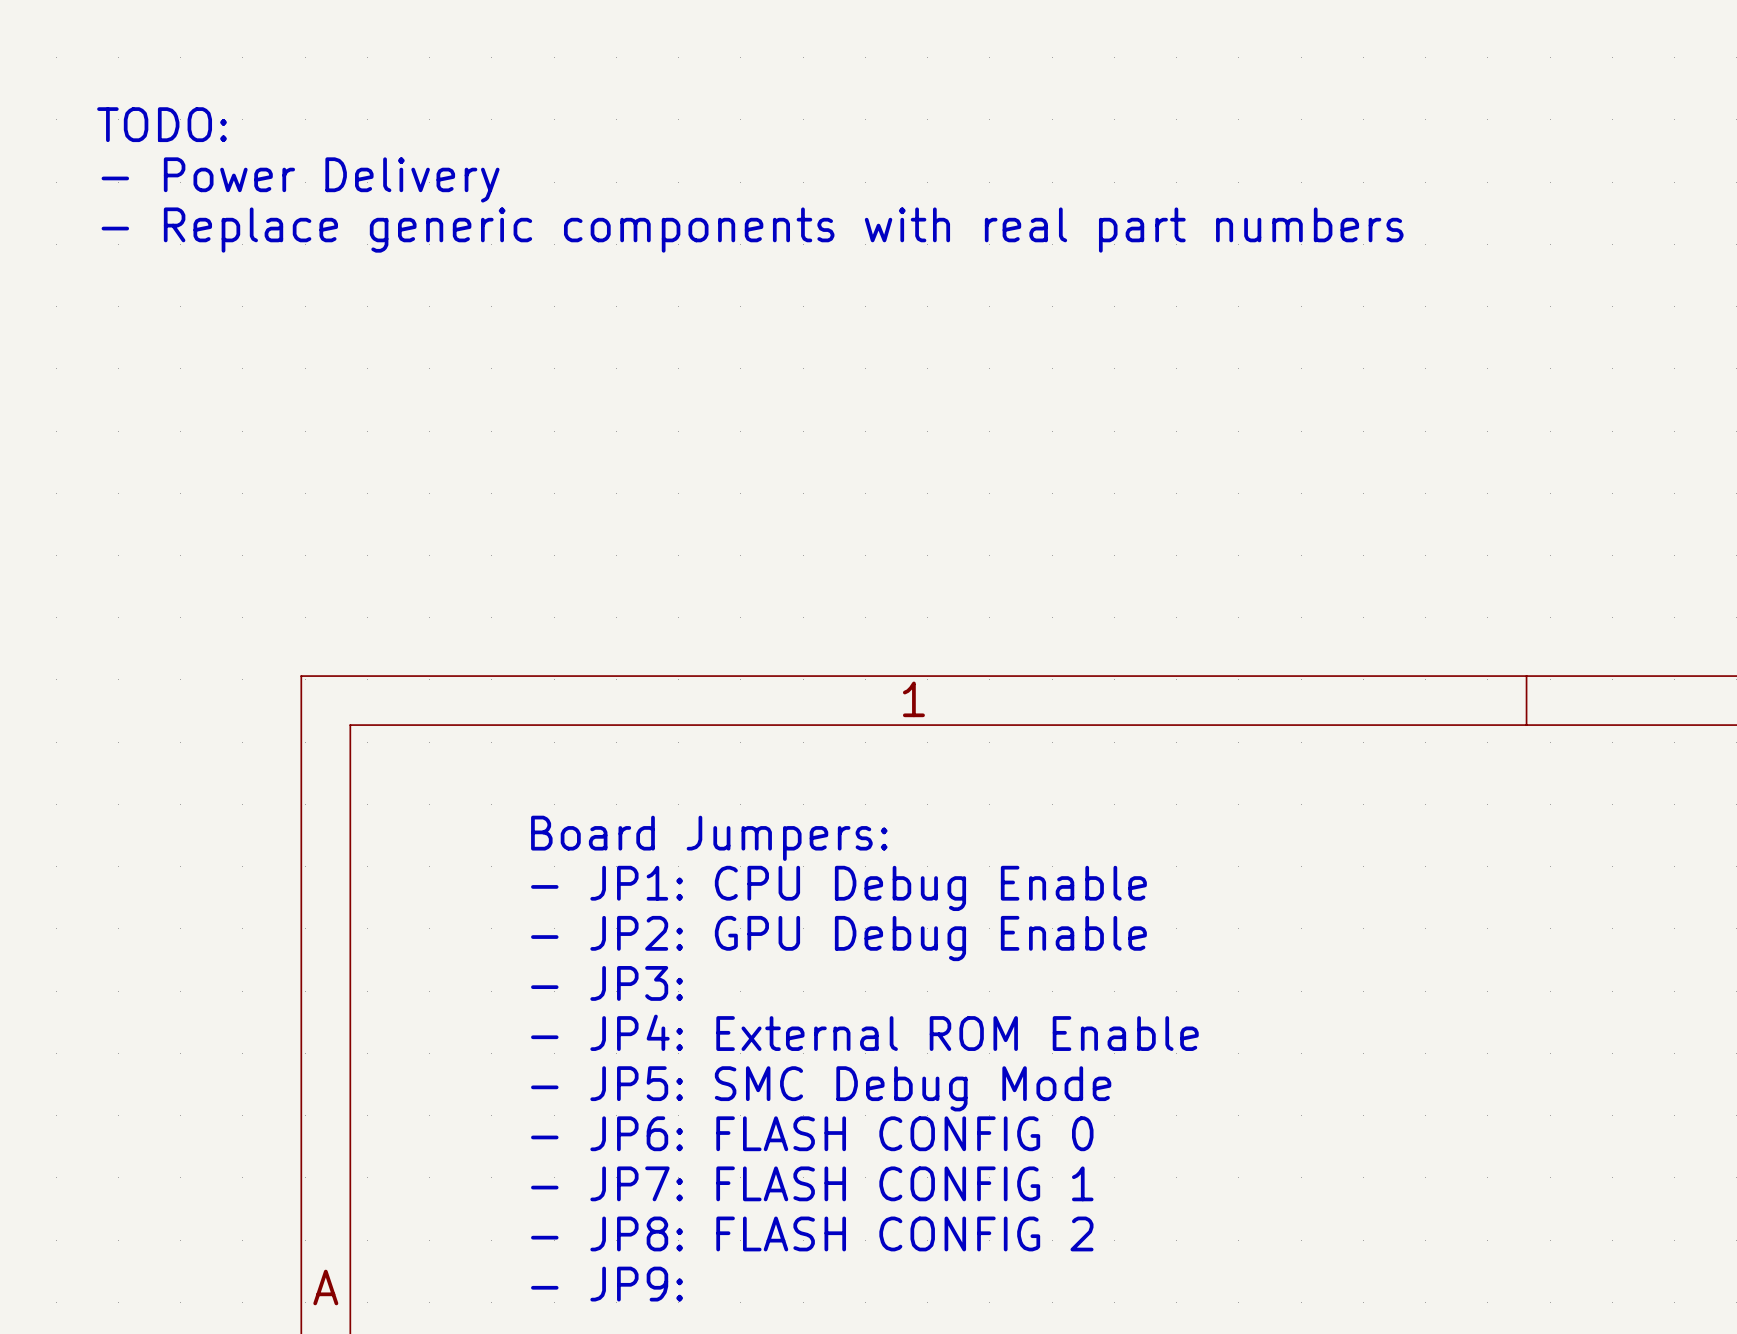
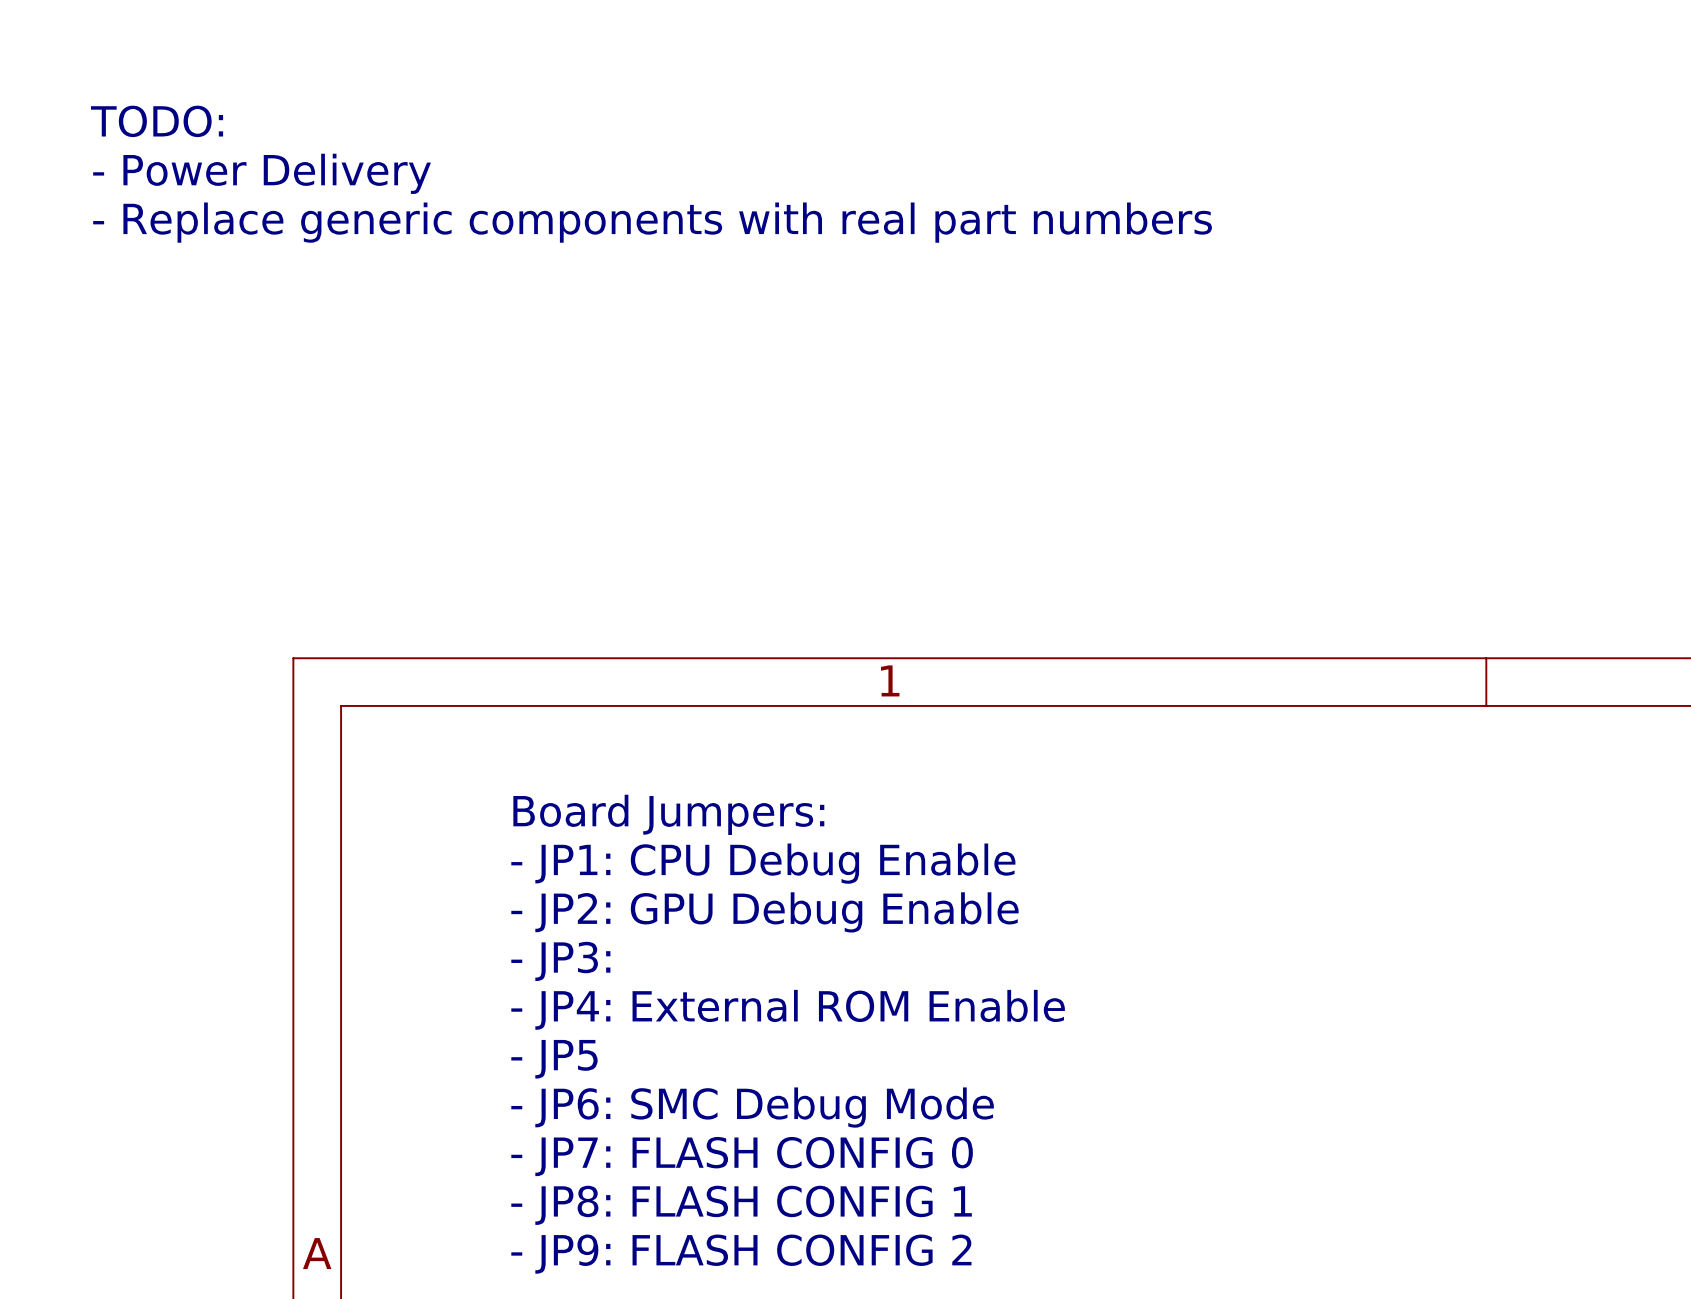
text: - JP5: SMC Debug Mode (821, 1088) -> - JP5 (554, 1059)
text: - JP6: FLASH CONFIG 0 (812, 1133) -> - JP6: SMC Debug Mode (752, 1107)
text: - JP7: FLASH CONFIG 1 (812, 1183) -> - JP7: FLASH CONFIG 0 (742, 1156)
text: - JP8: FLASH CONFIG 2 (812, 1233) -> - JP8: FLASH CONFIG 1 (741, 1205)
text: - JP9: (607, 1284) -> - JP9: FLASH CONFIG 2 (741, 1254)

